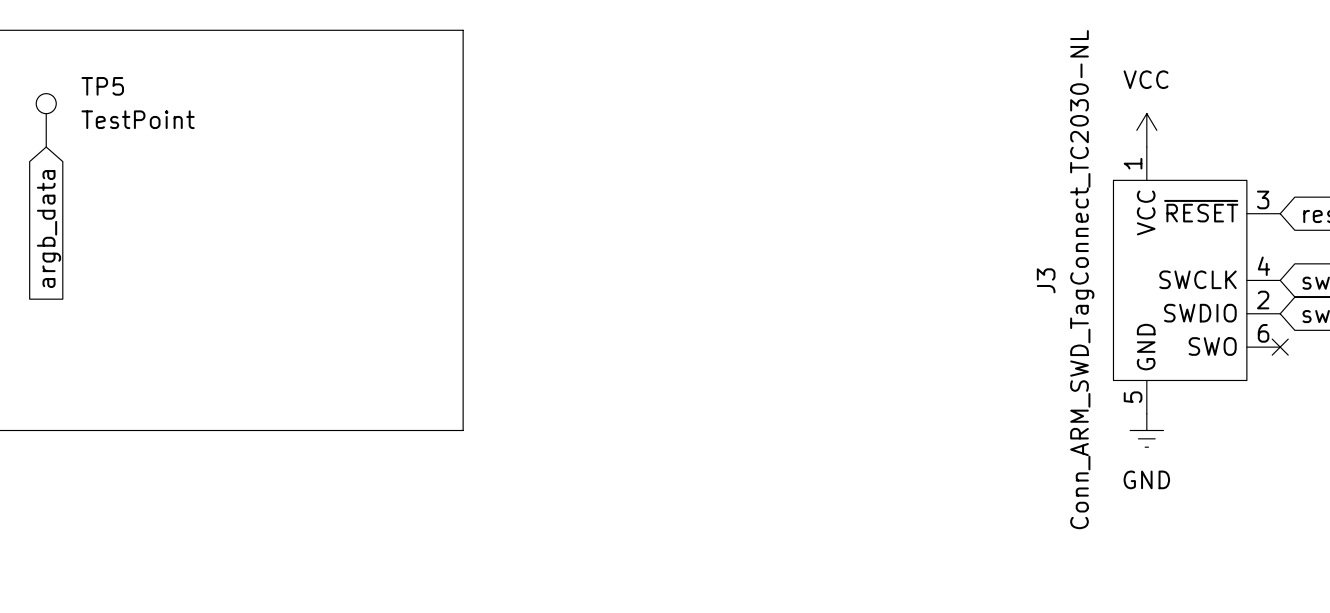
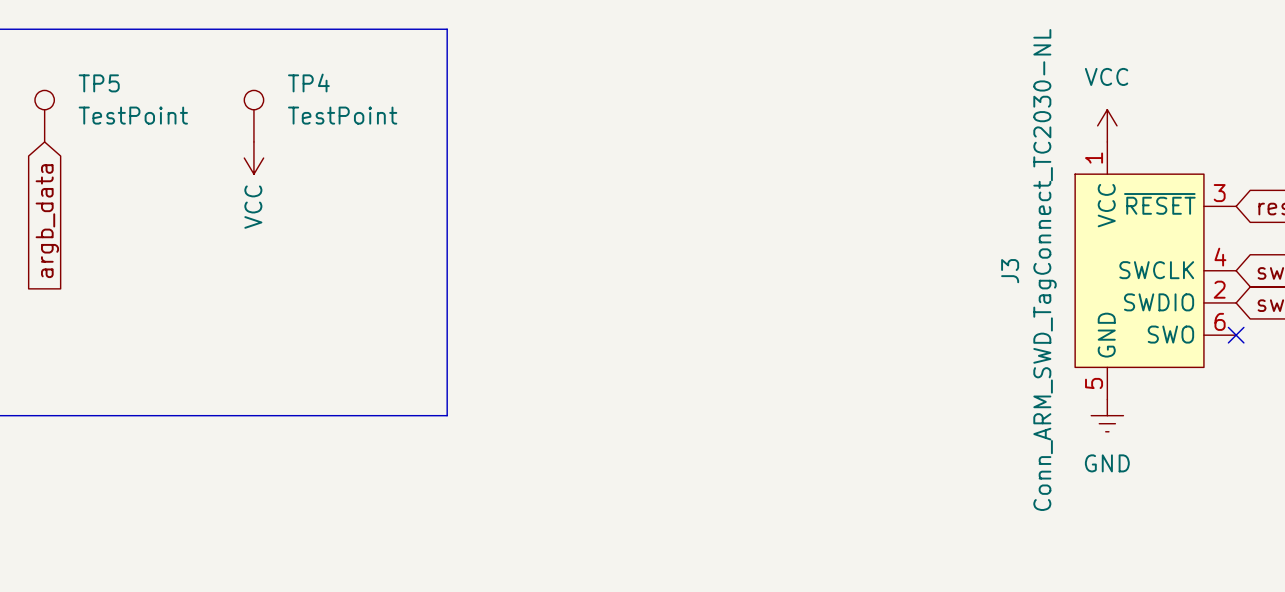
TP4: none -> TestPoint (253, 116)
power symbol: none -> VCC (253, 158)

